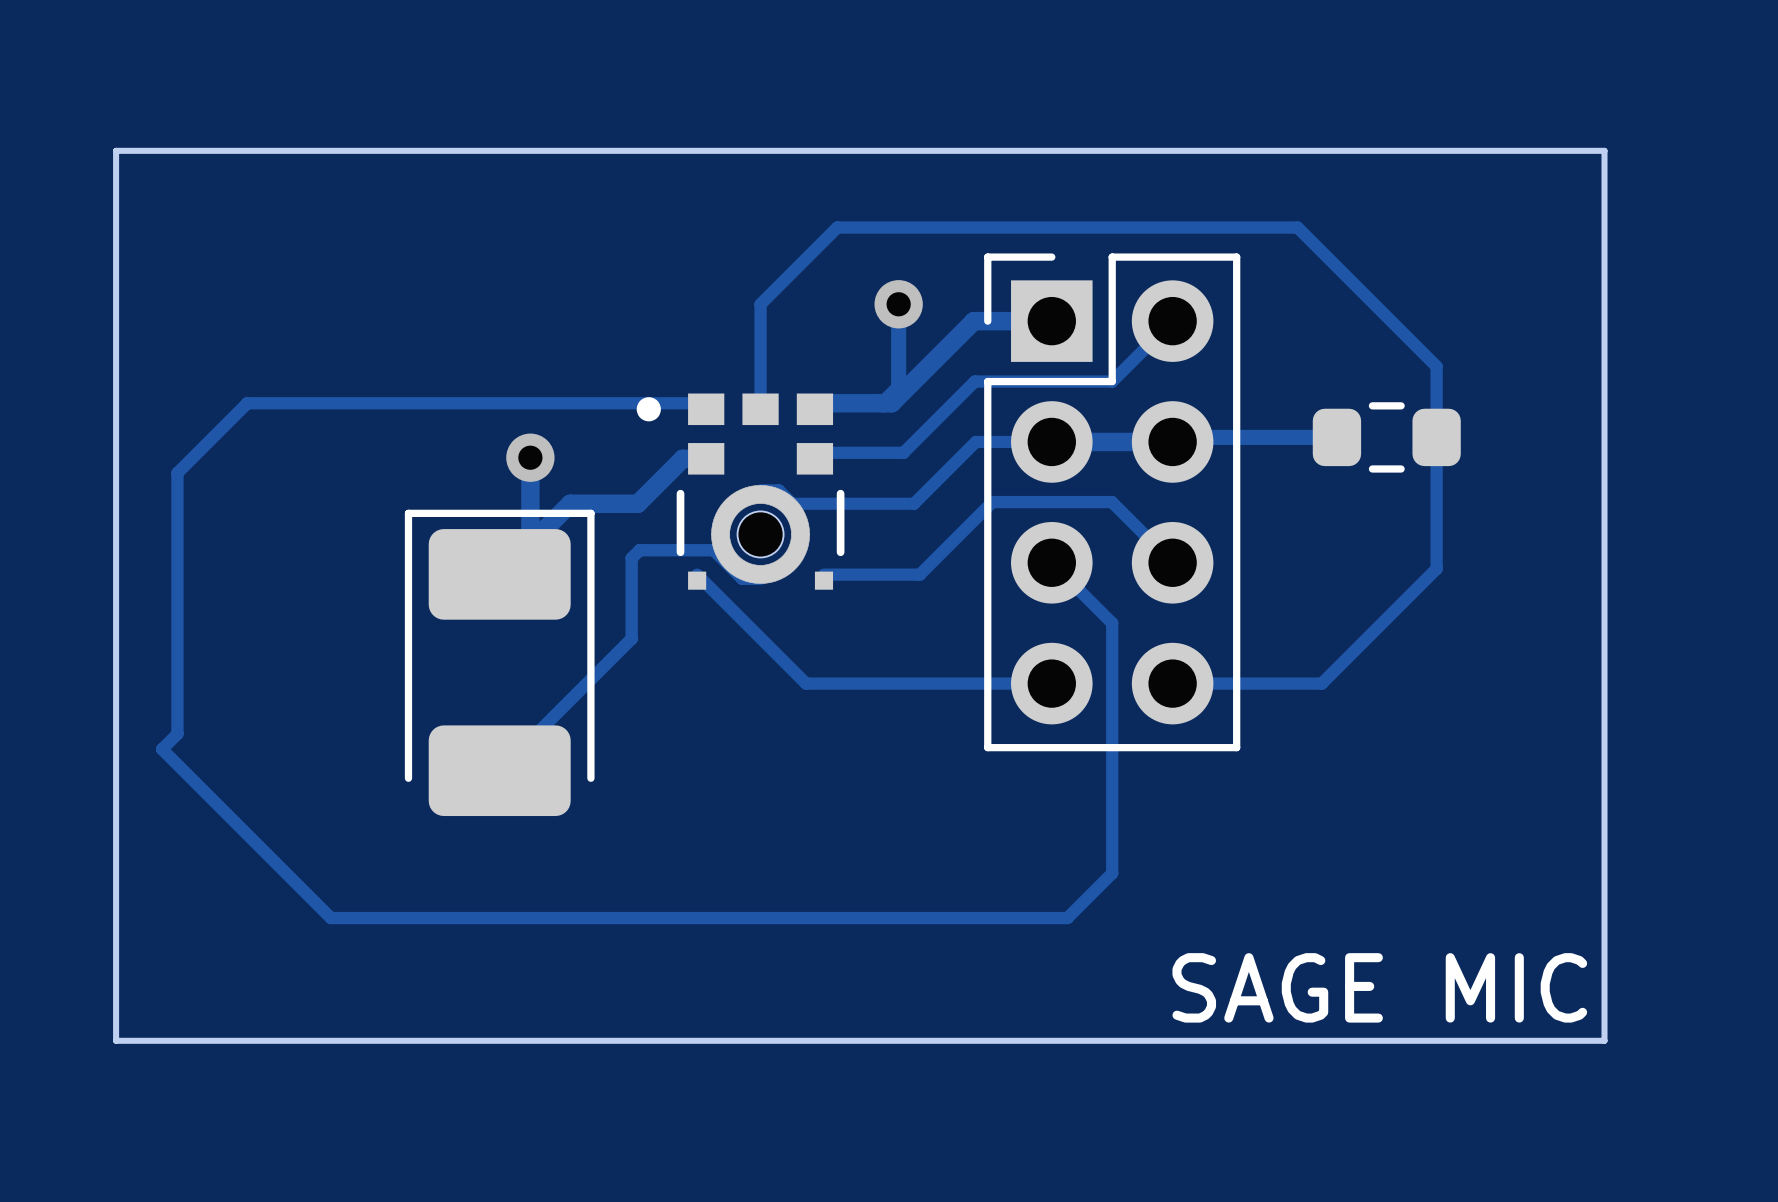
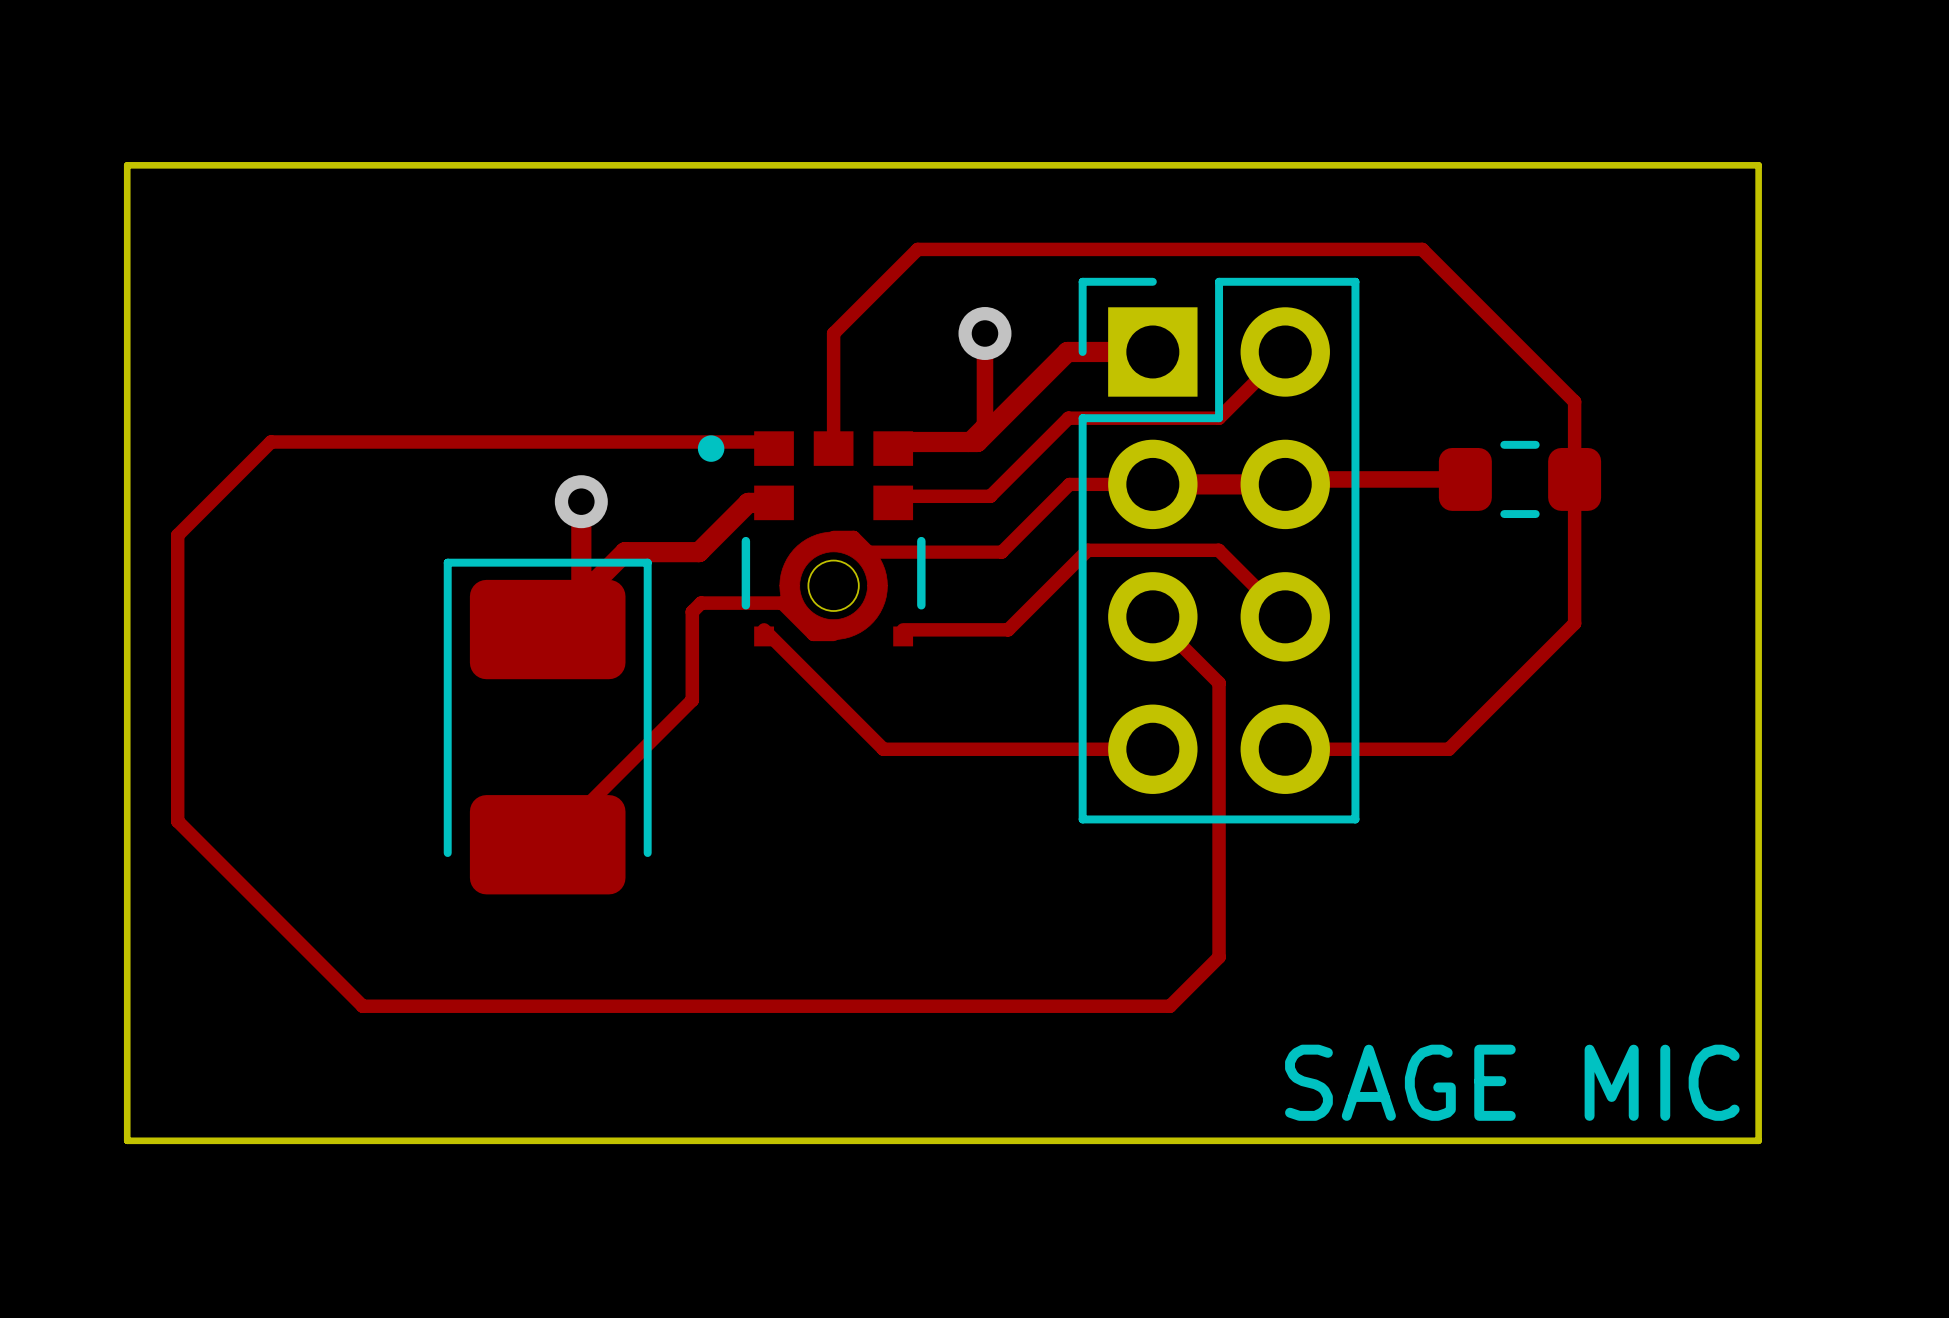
track: (177, 473) (177, 733) (162, 749) -> (194, 518) (177, 535) (177, 821)

